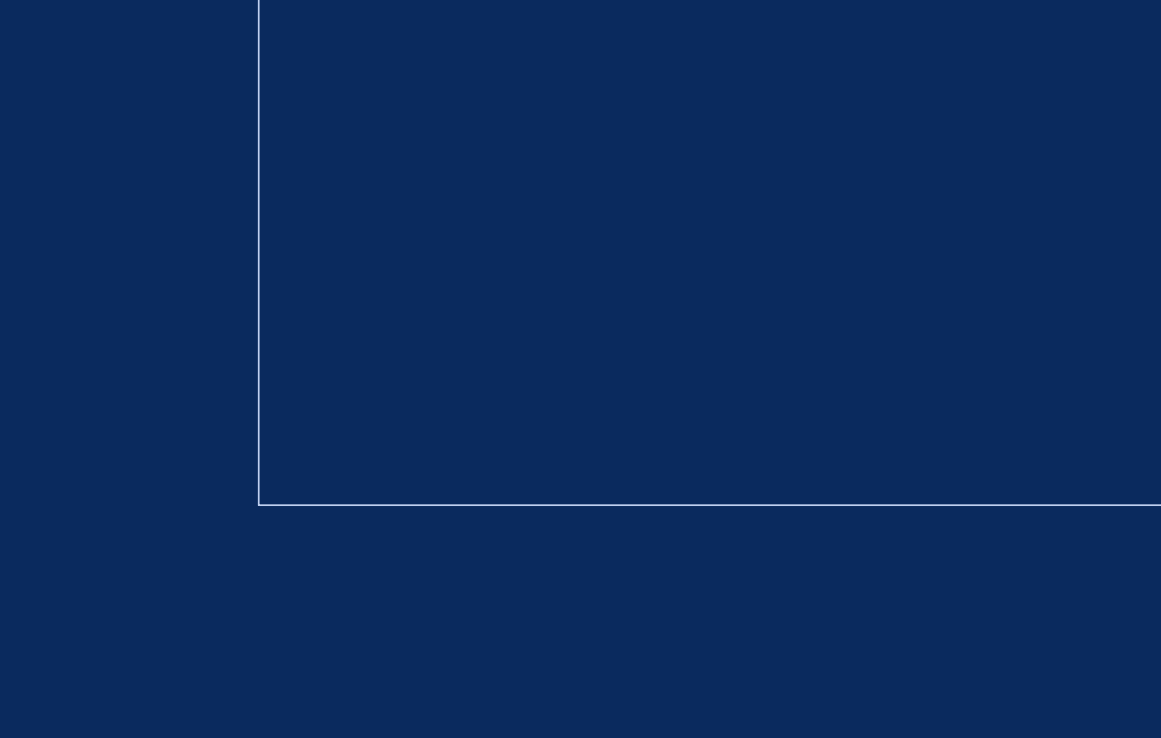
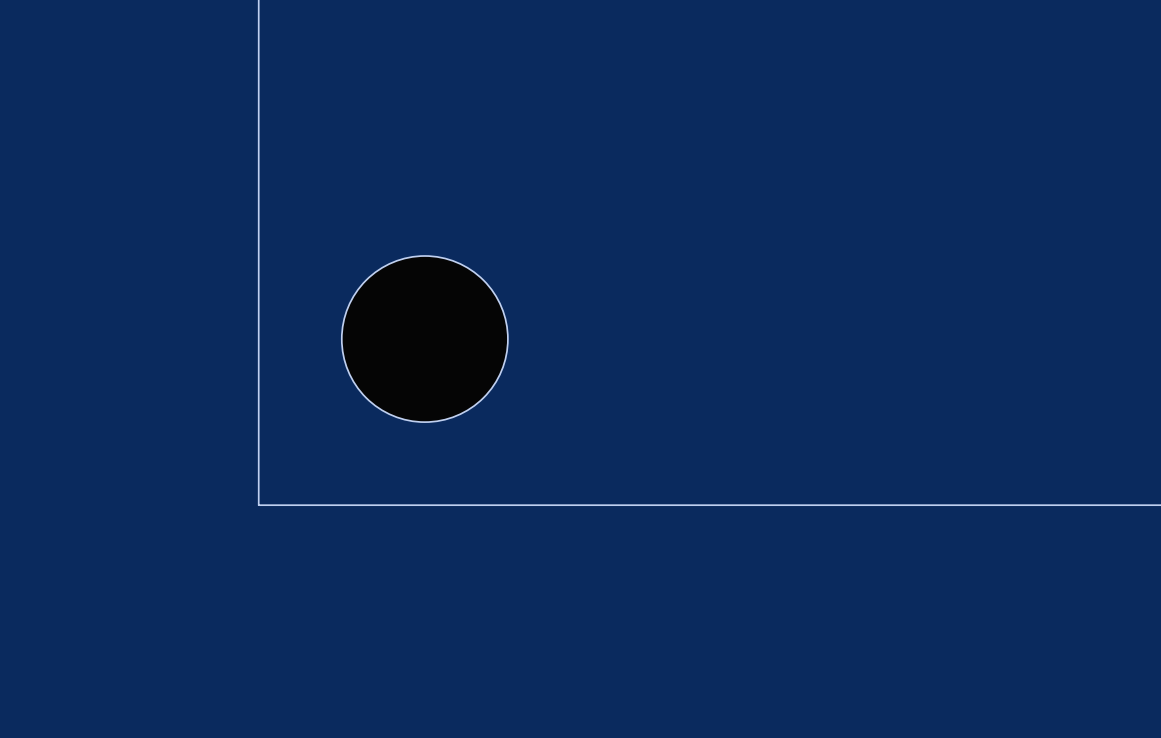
hole: none -> (424, 339)

